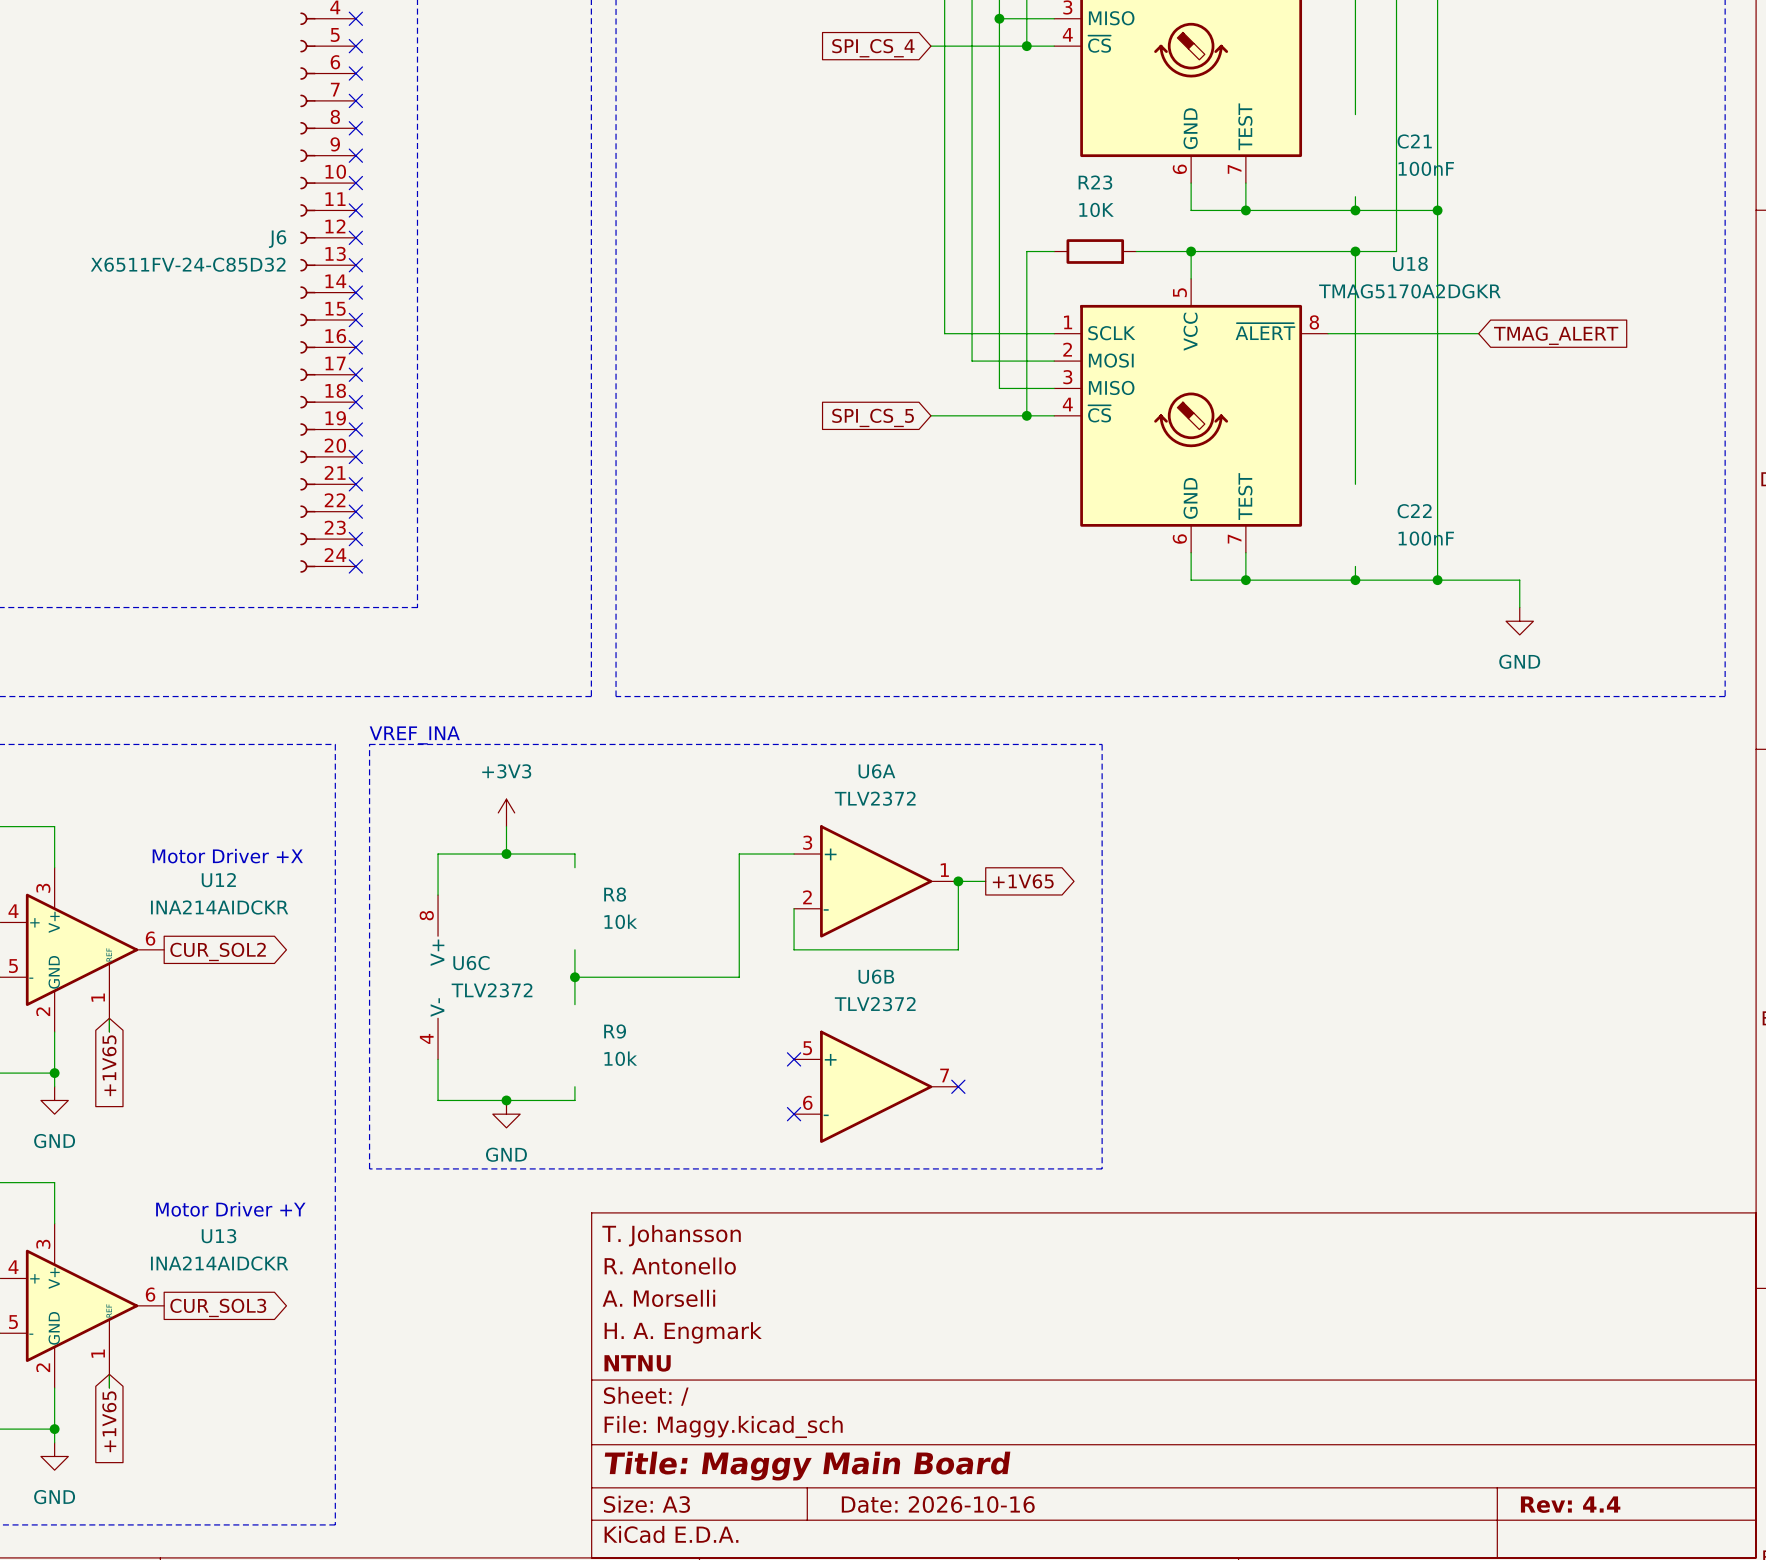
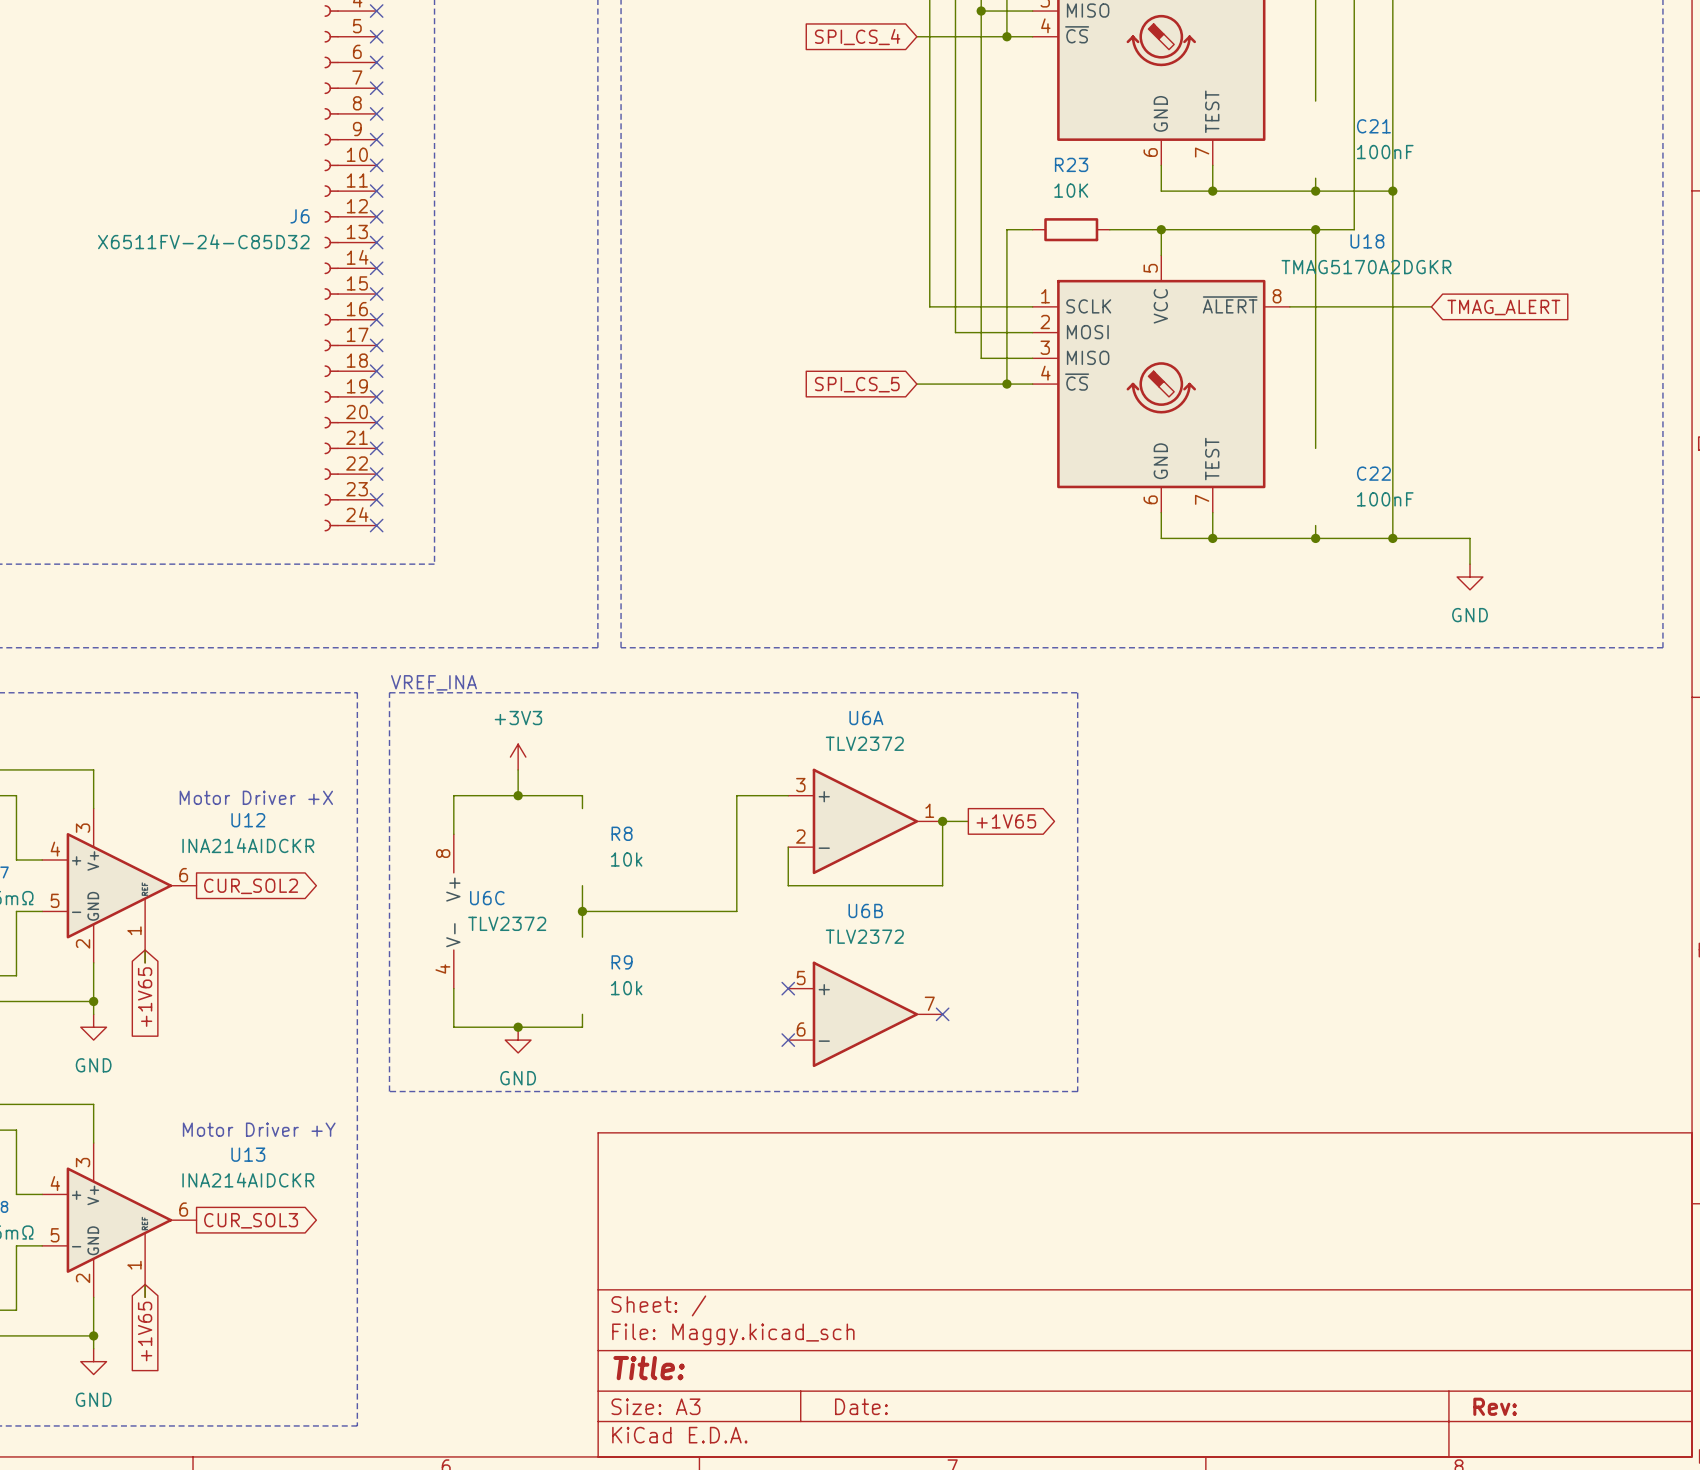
title block: T. Johansson (671, 1235) -> none
title block: R. Antonello (670, 1266) -> none
title block: A. Morselli (658, 1298) -> none
title block: H. A. Engmark (683, 1332) -> none
title block: NTNU (637, 1363) -> none
title block: Title: Maggy Main Board (807, 1466) -> Title: (649, 1368)
title block: Date: 2026-10-16 (938, 1504) -> Date: (861, 1406)
title block: Rev: 4.4 (1570, 1504) -> Rev: (1495, 1406)

